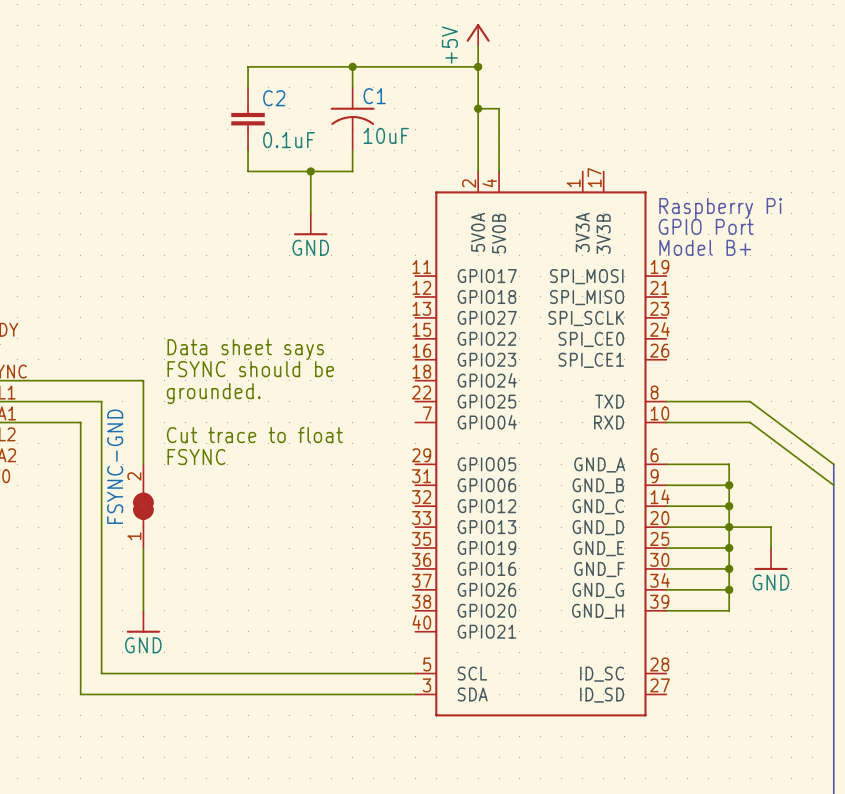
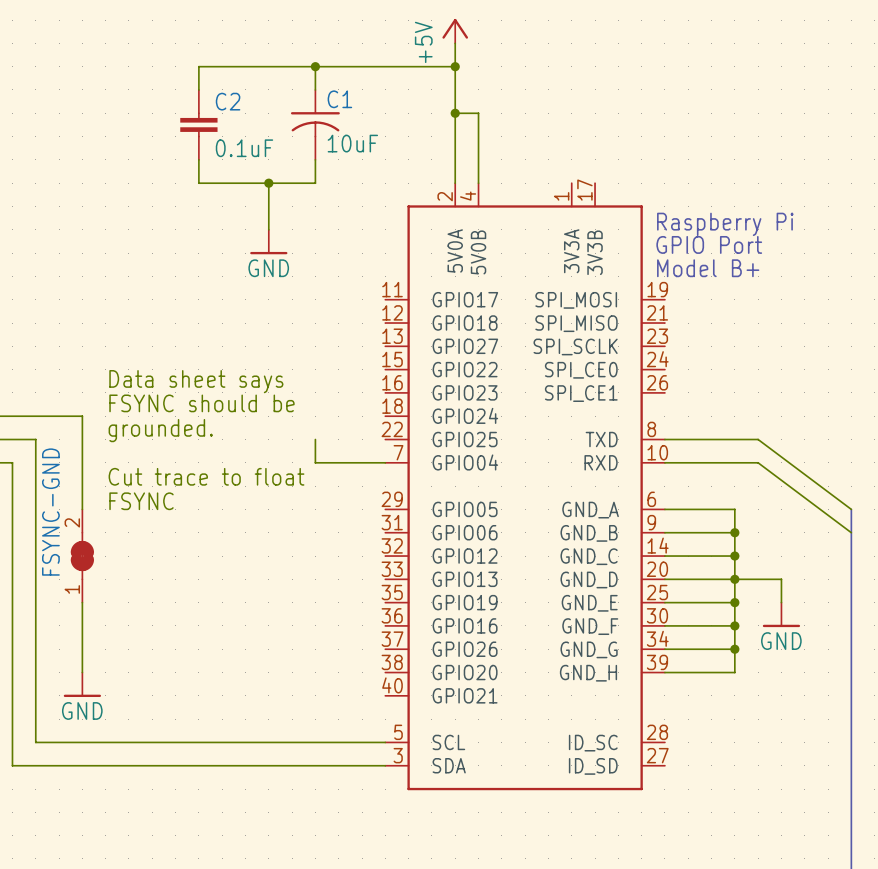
wire: none -> (315, 439) (315, 462) (385, 462)

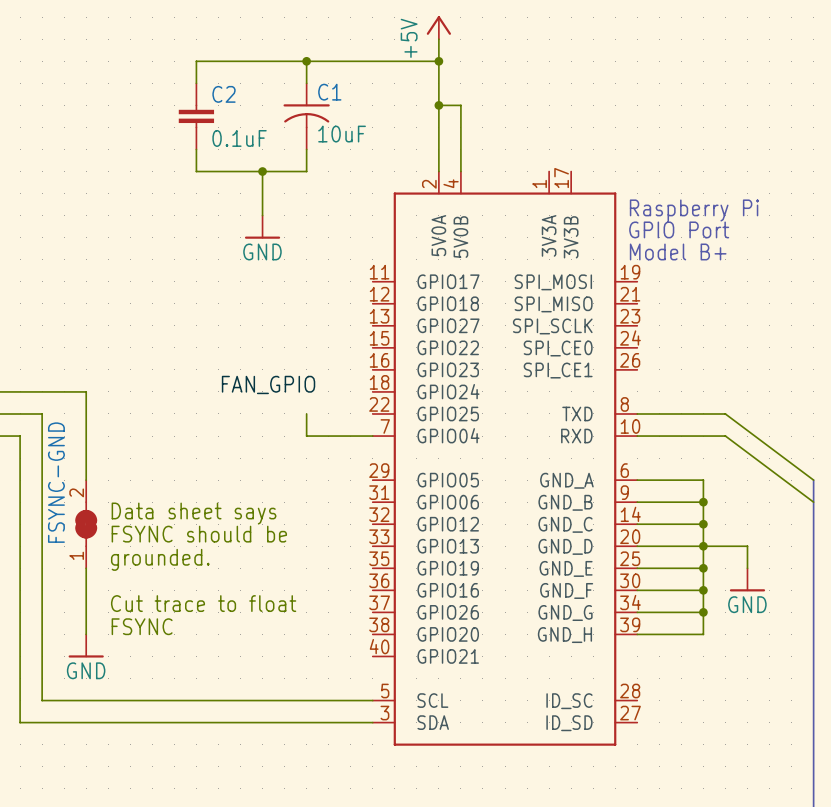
text position: Data sheet says (196, 381) -> Data sheet says (194, 513)
text position: FSYNC should be (201, 403) -> FSYNC should be (199, 534)
label: none -> FAN_GPIO (268, 384)
text position: grounded. (160, 430) -> grounded. (160, 559)
text position: Cut trace to float (206, 476) -> Cut trace to float (203, 603)
text position: FSYNC (141, 501) -> FSYNC (142, 626)

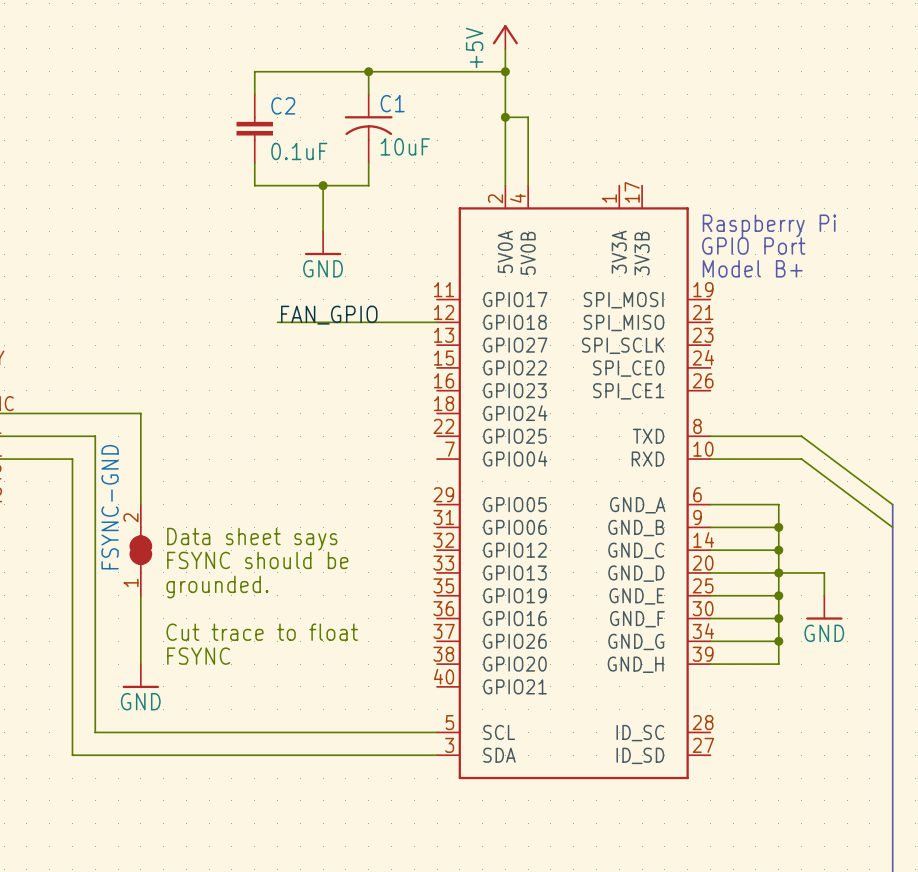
wire: none -> (277, 322) (437, 322)
label position: FAN_GPIO (268, 384) -> FAN_GPIO (329, 315)
wire: (306, 413) (306, 436) (372, 436) -> none

